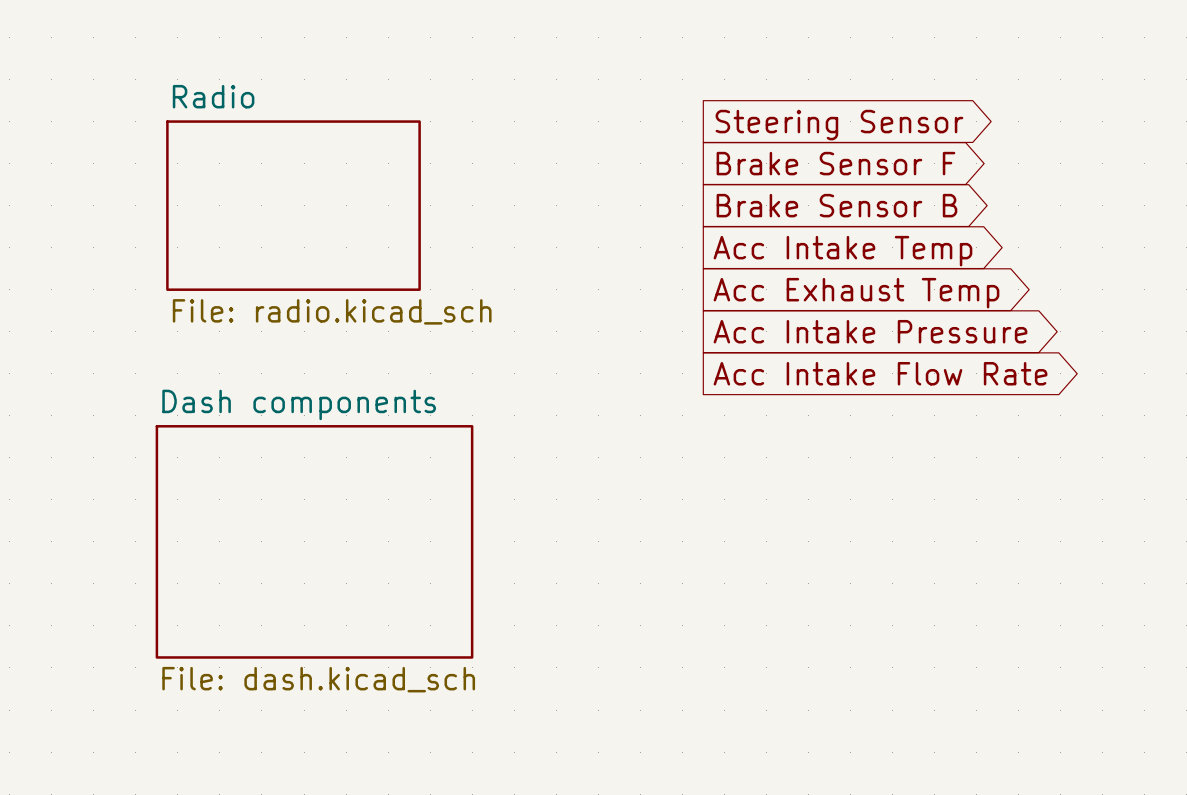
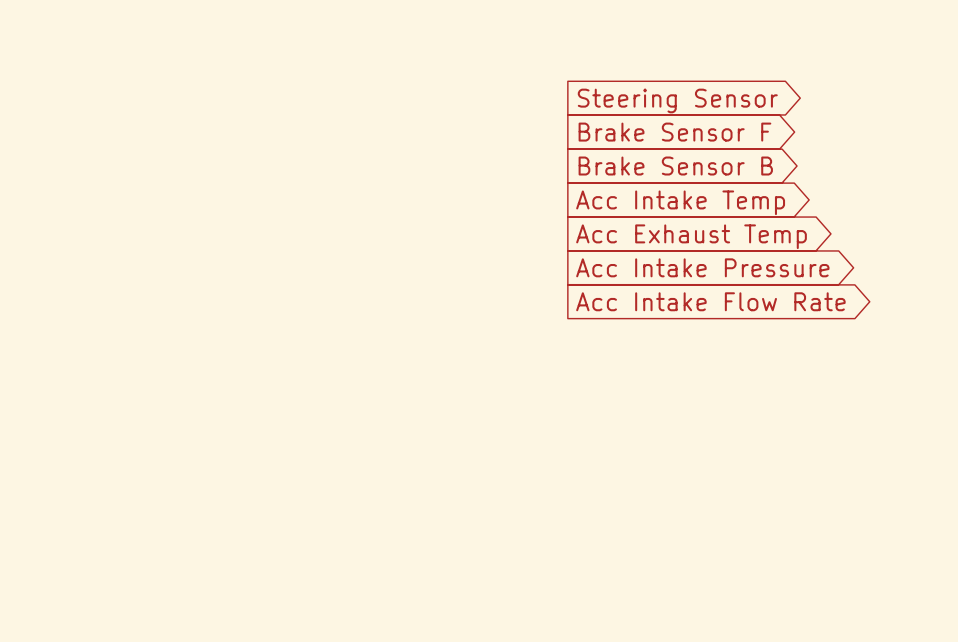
sheet Radio: File: radio.kicad_sch (293, 205) -> none
sheet Dash components: File: dash.kicad_sch (314, 541) -> none

